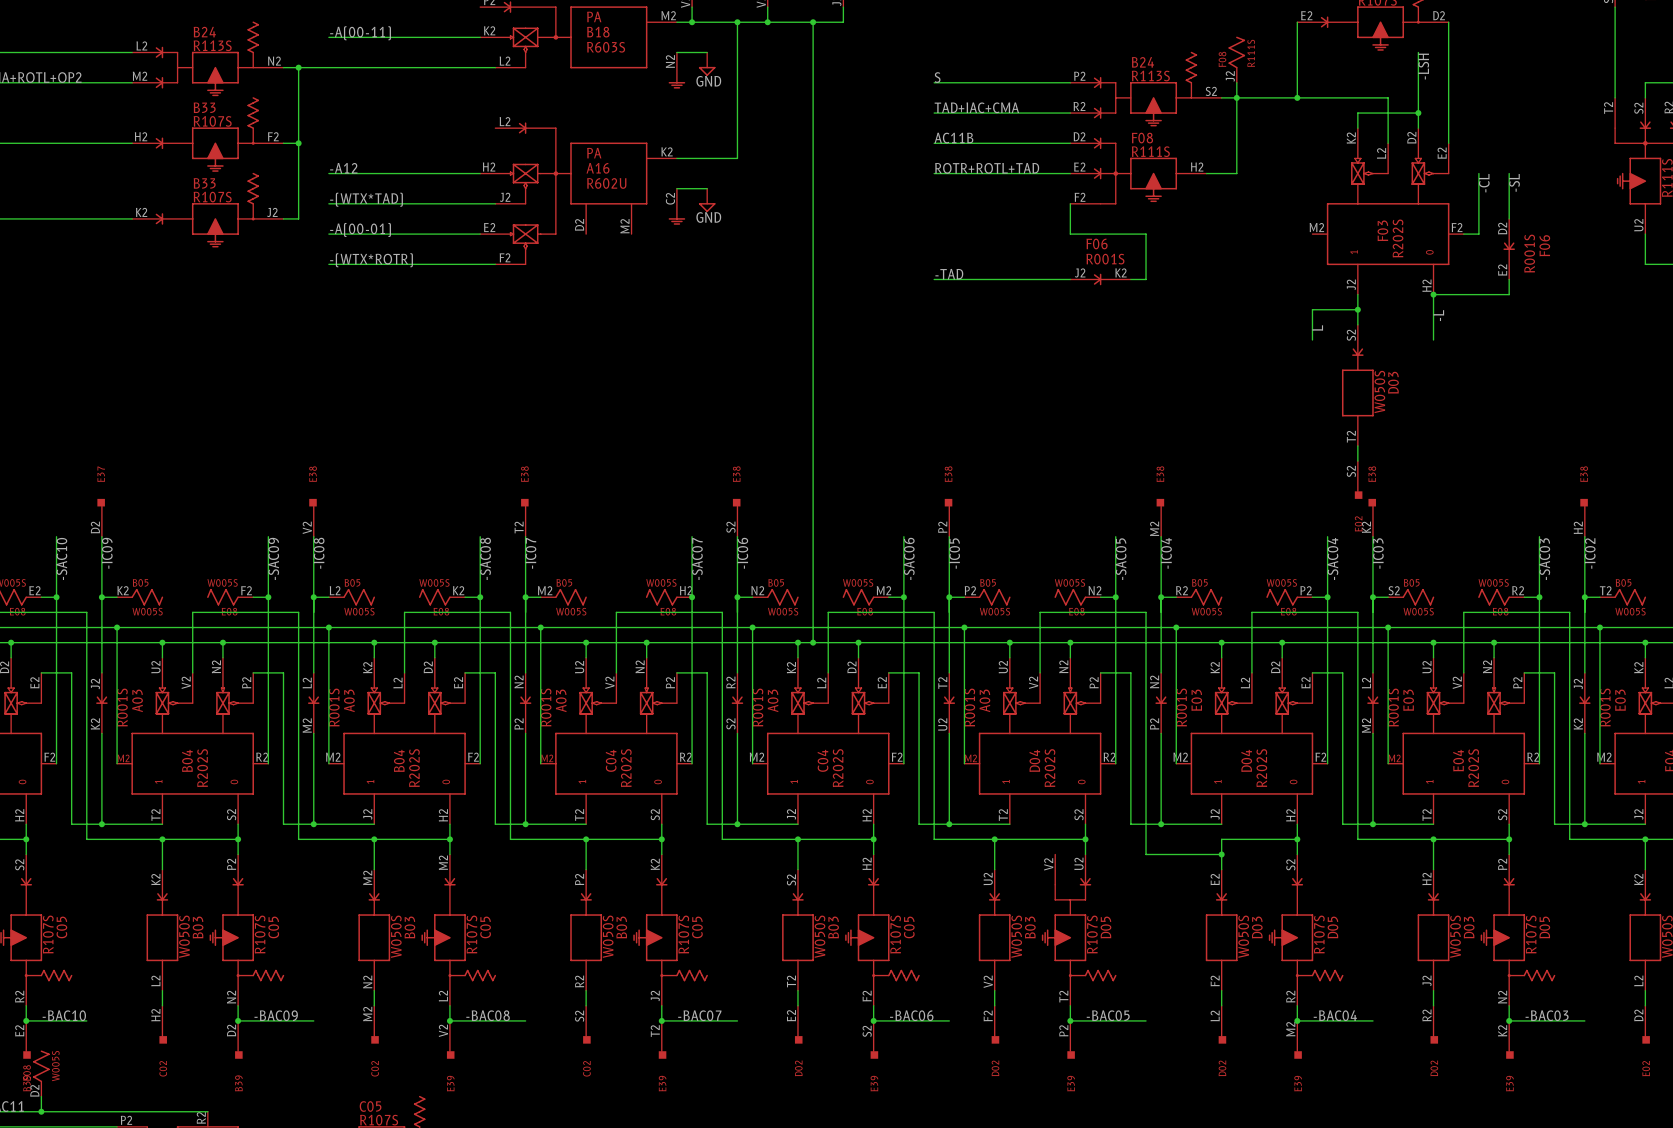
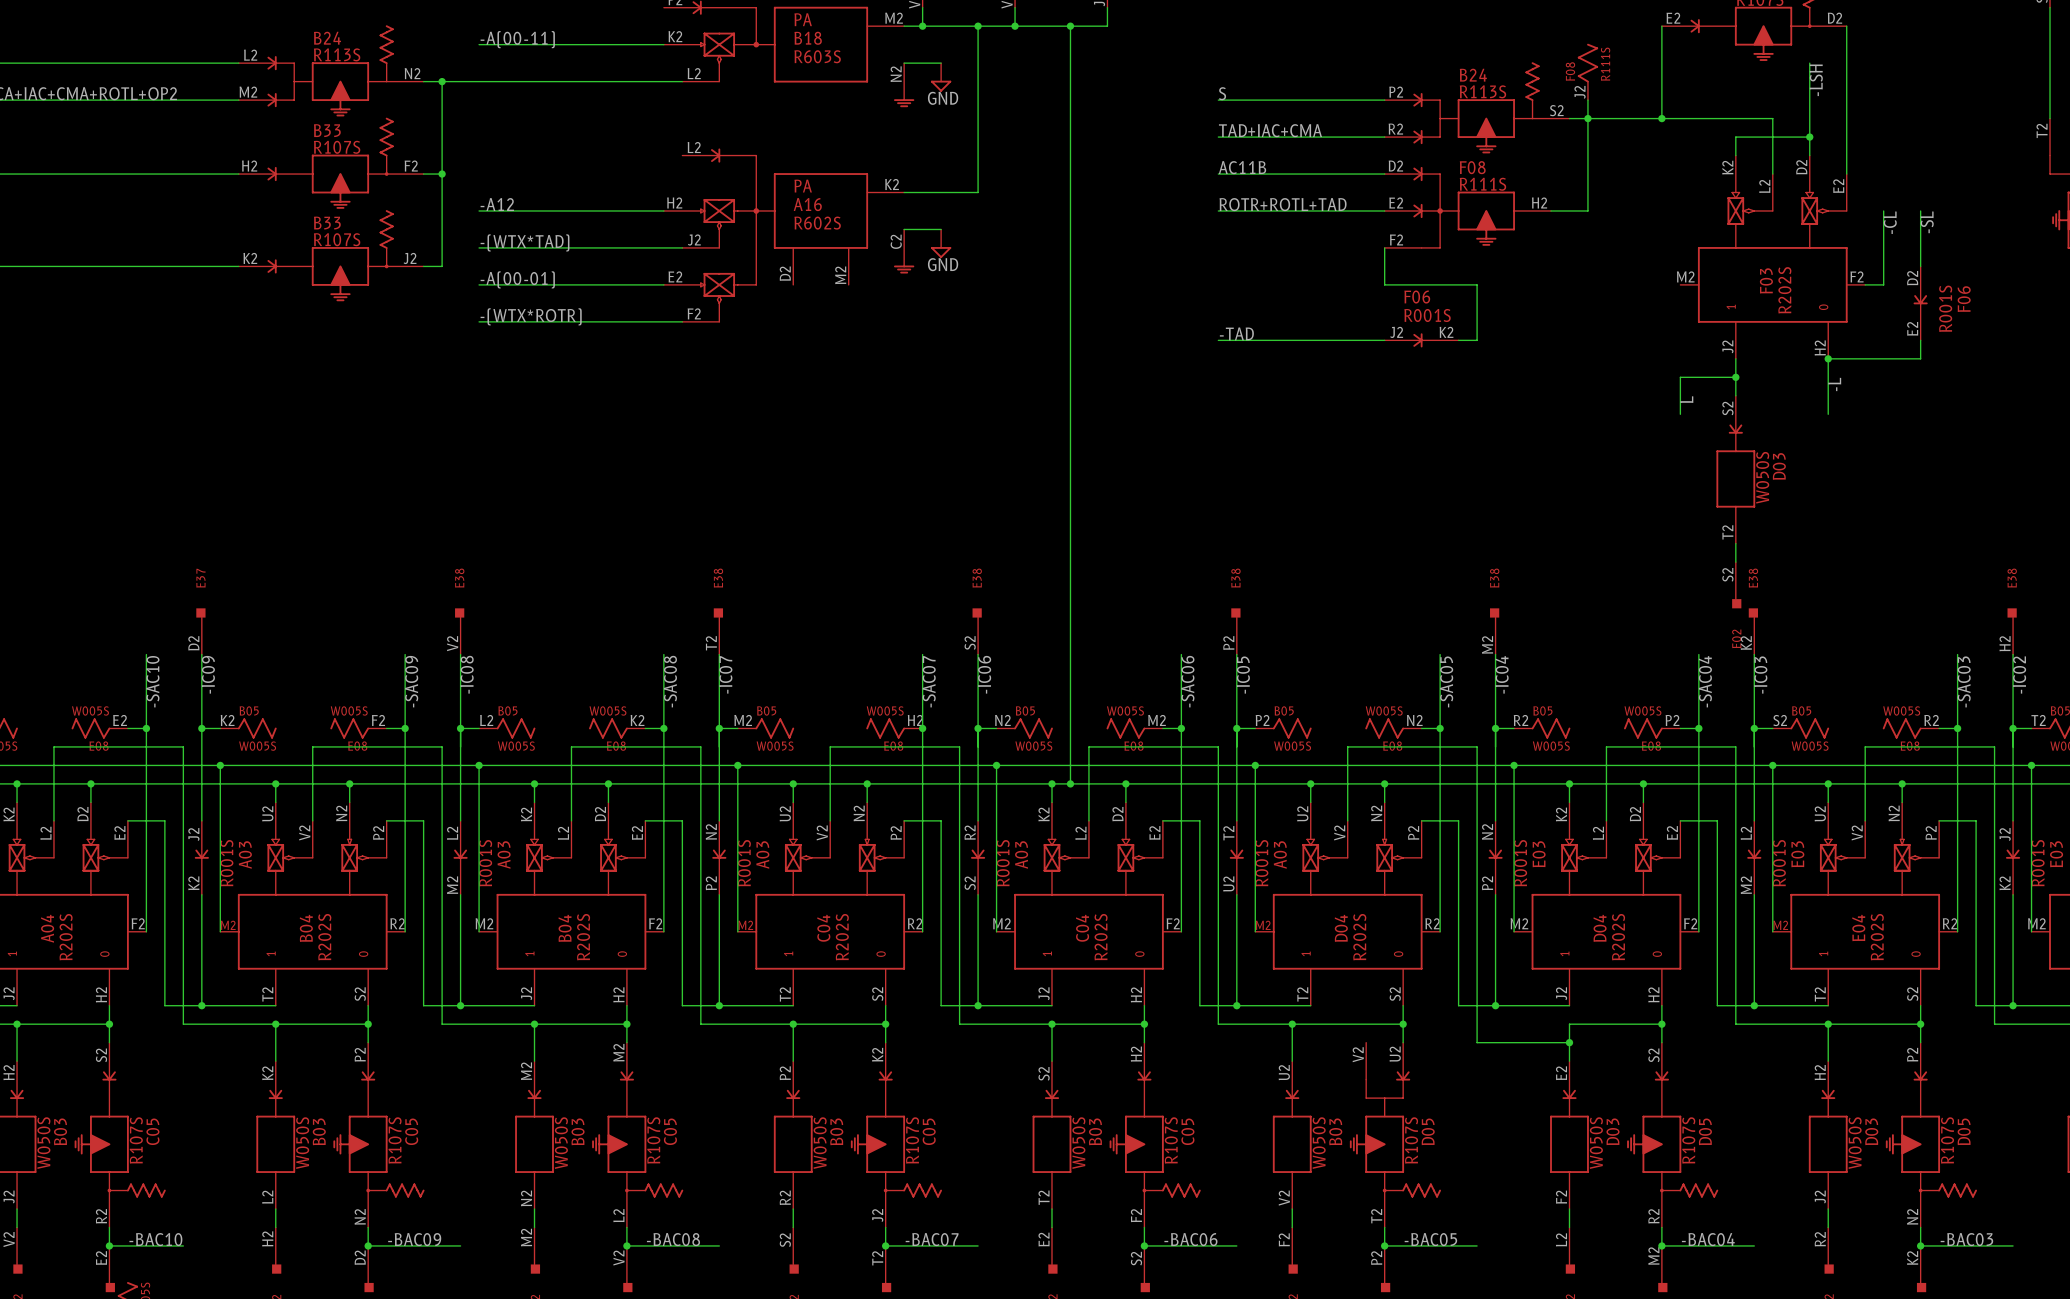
A16 value: R602U (606, 183) -> R602S (817, 223)

